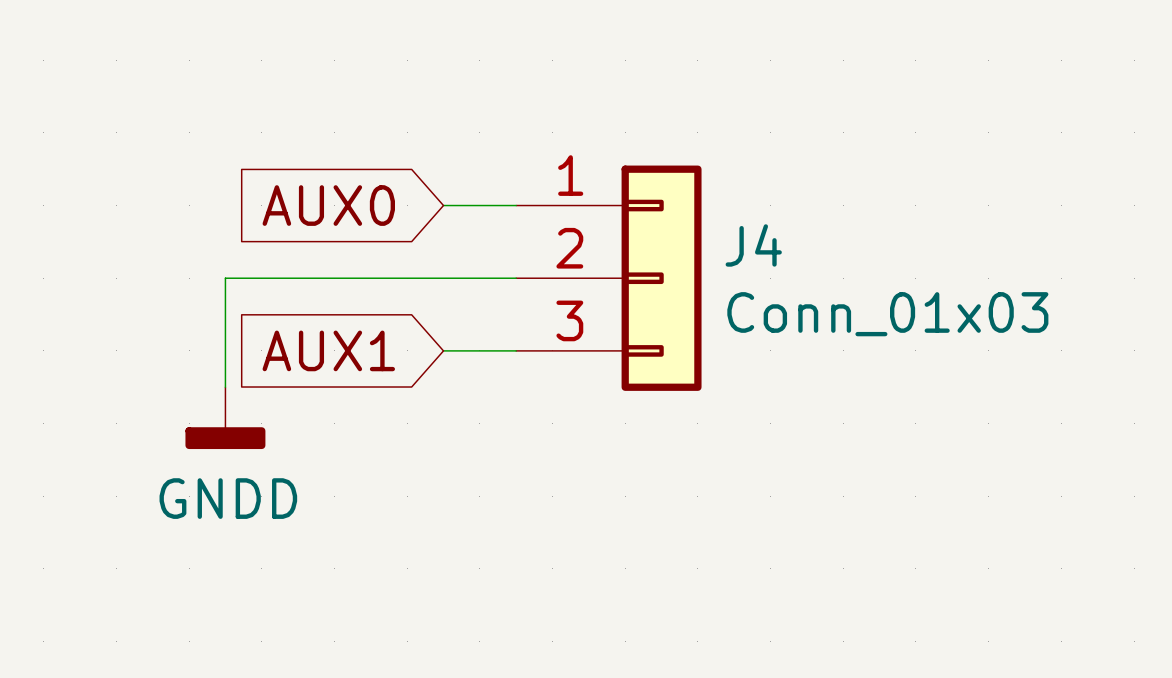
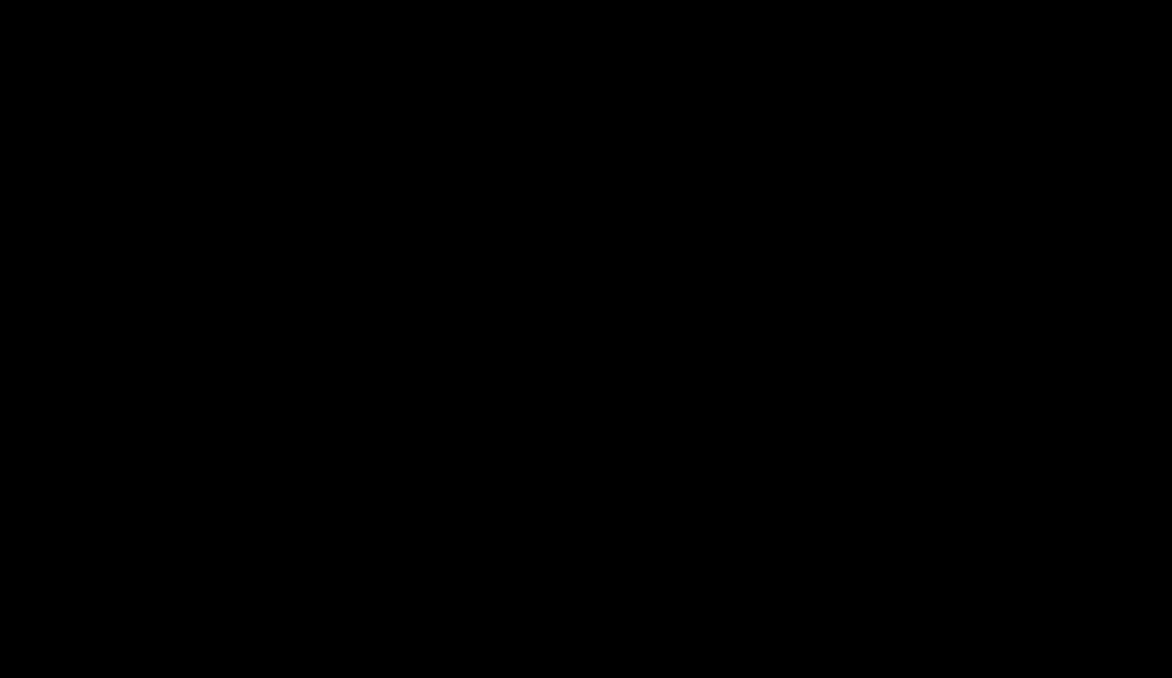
global label: AUX0 (328, 205) -> none
wire: (443, 205) (516, 205) -> none
wire: (516, 278) (225, 278) (225, 387) -> none
J4: Conn_01x03 (608, 278) -> none
global label: AUX1 (328, 350) -> none
wire: (443, 350) (516, 350) -> none
power symbol: GNDD (225, 418) -> none

